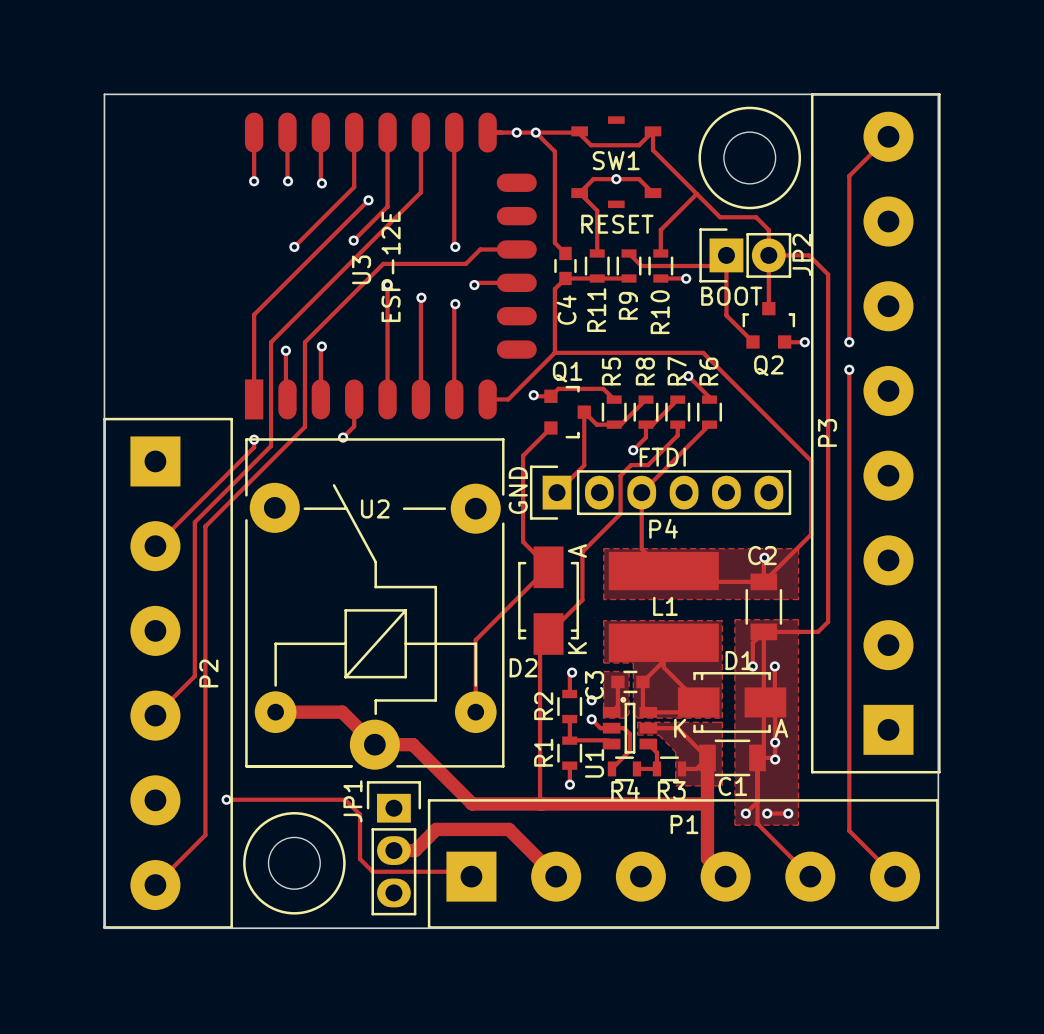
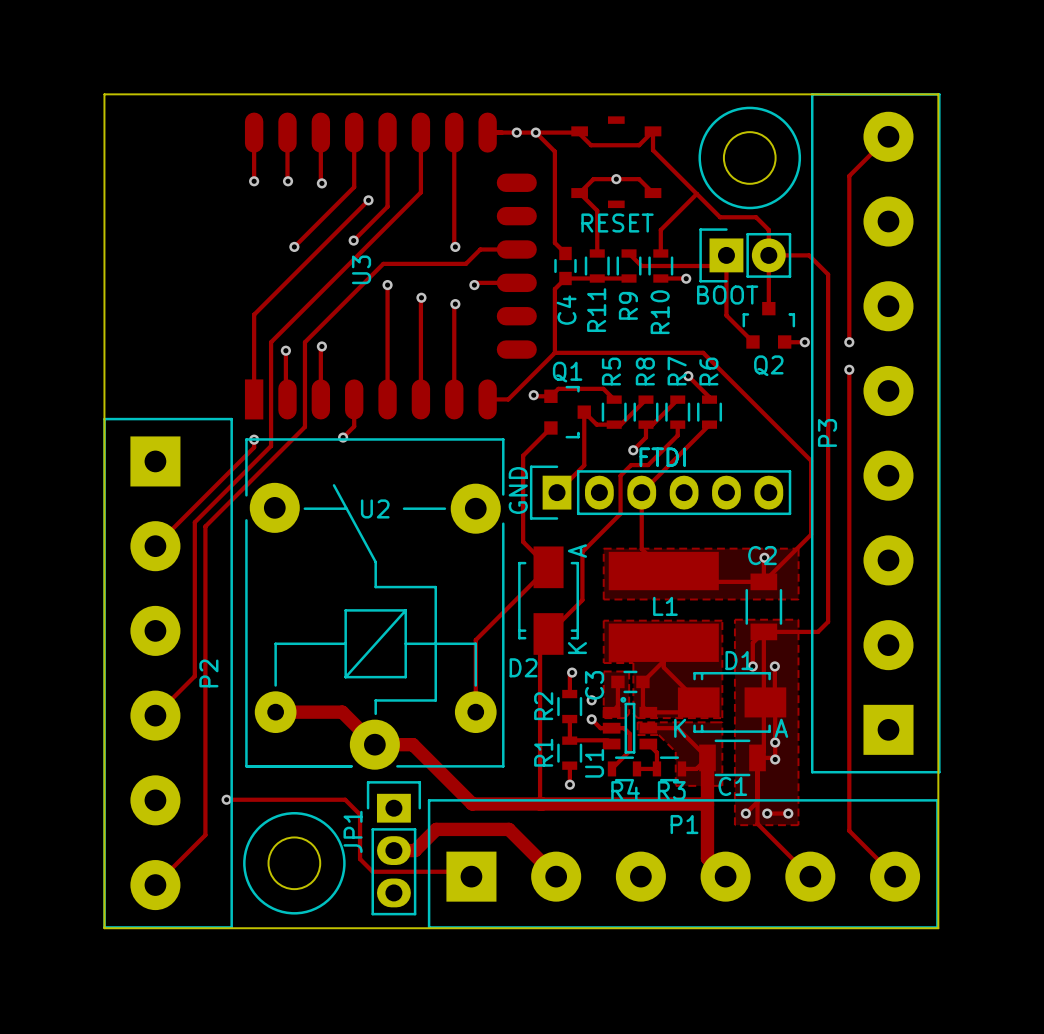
SW1 name: SW1 (616, 160) -> RESET (617, 223)
SW1 value: RESET (617, 224) -> none
JP2 name: JP2 (801, 254) -> BOOT (727, 295)
U3 value: ESP-12E (391, 266) -> none
JP2 value: BOOT (731, 296) -> none
P4 name: P4 (663, 528) -> FTDI (662, 457)
JP1 name position: JP1 (352, 801) -> JP1 (353, 831)

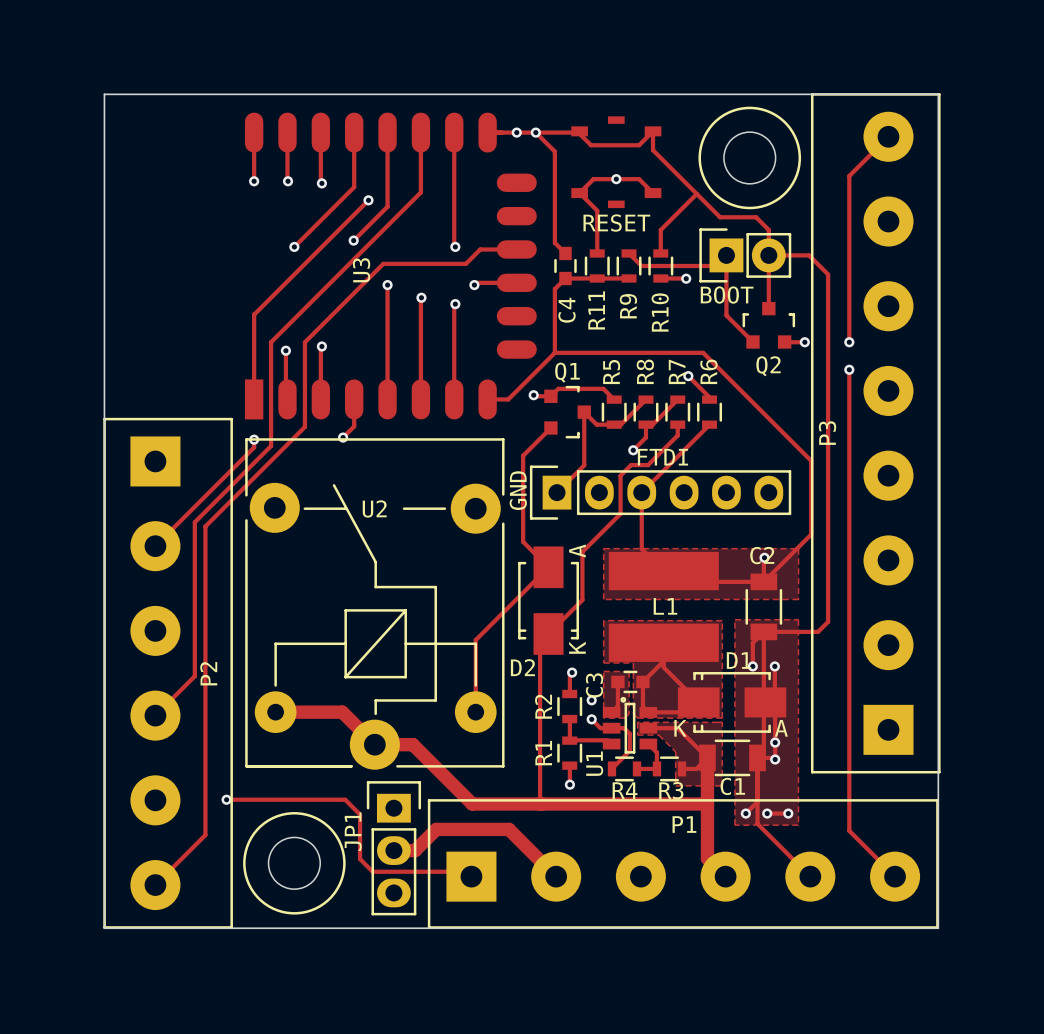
FTDI name: FTDI (662, 457) -> none

